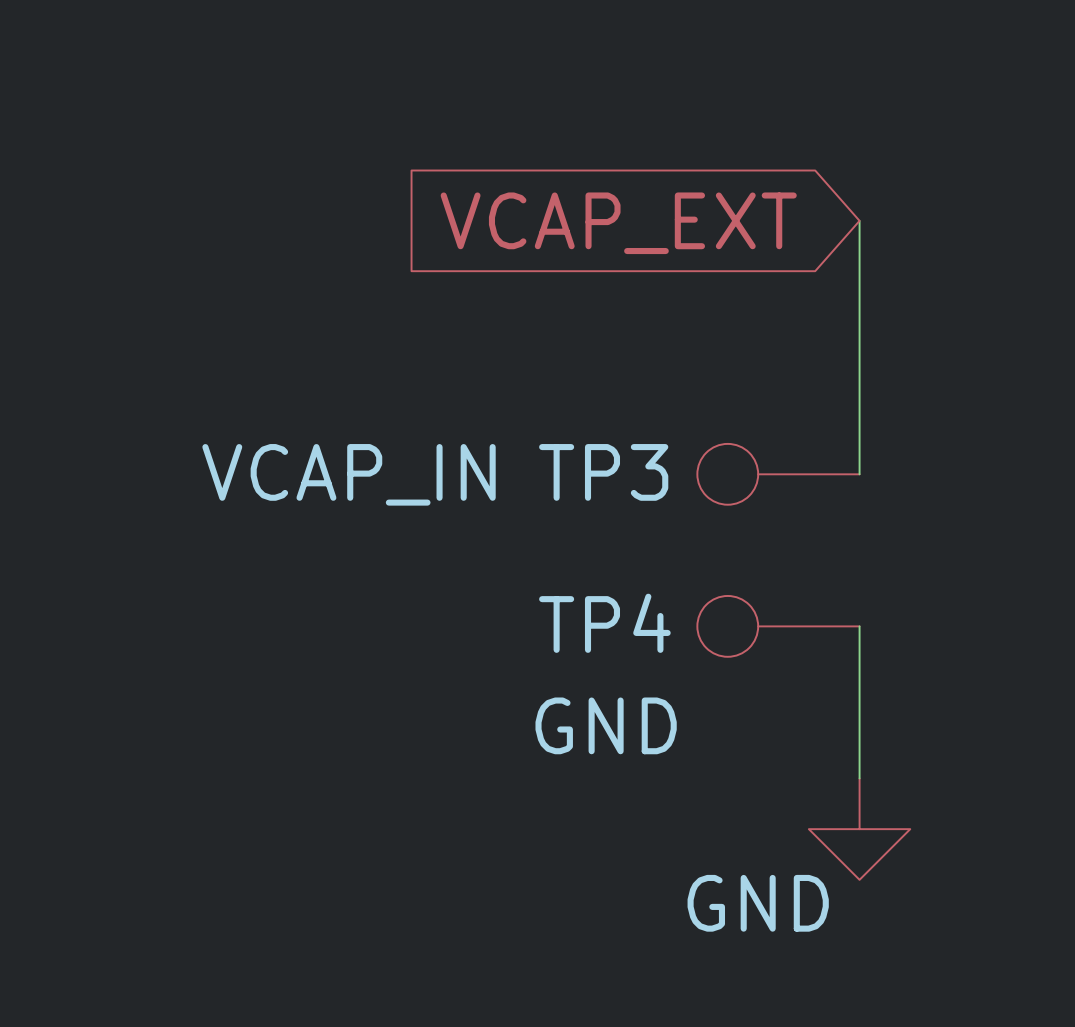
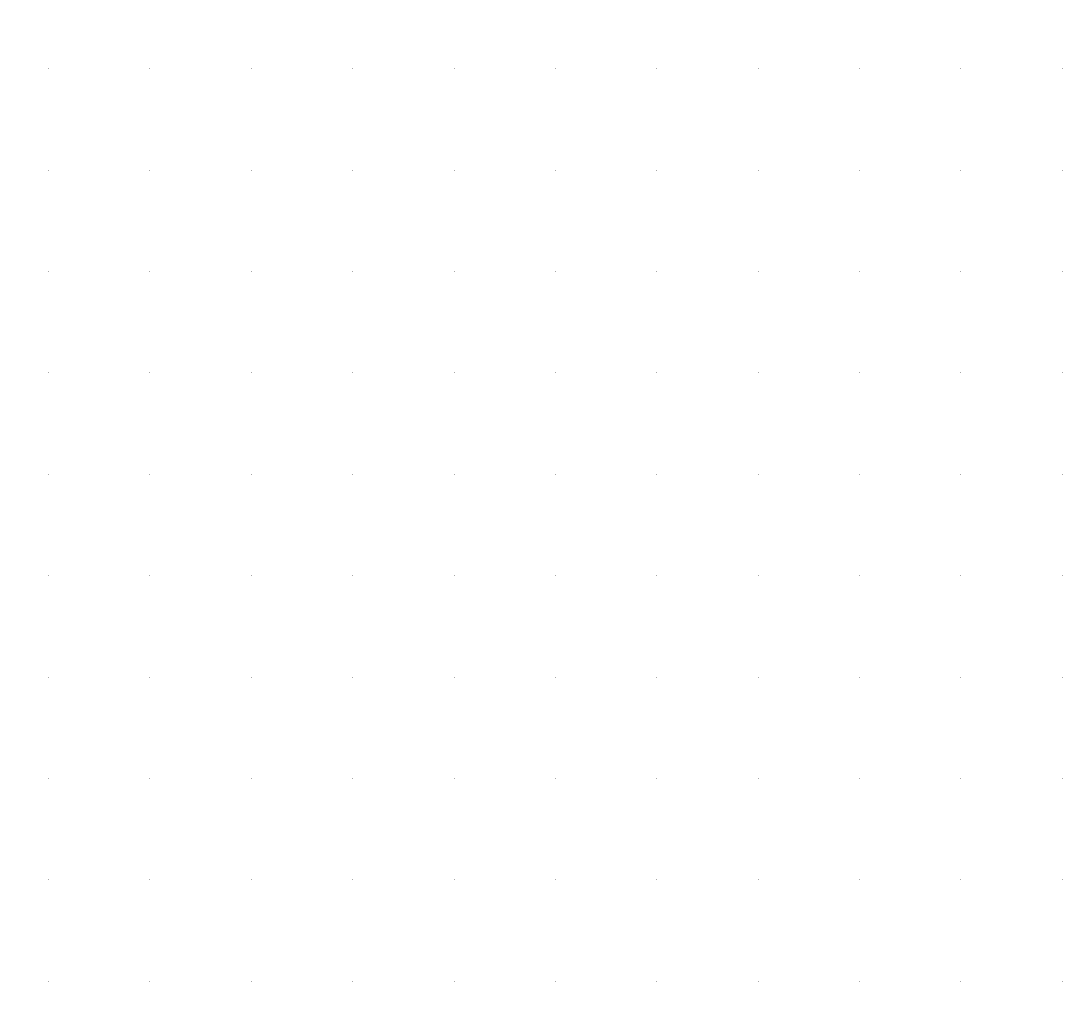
wire: (859, 220) (859, 474) -> none
global label: VCAP_EXT (618, 223) -> none
TP3: VCAP_IN (778, 474) -> none
TP4: GND (778, 626) -> none
wire: (859, 626) (859, 778) -> none
power symbol: GND (859, 829) -> none

